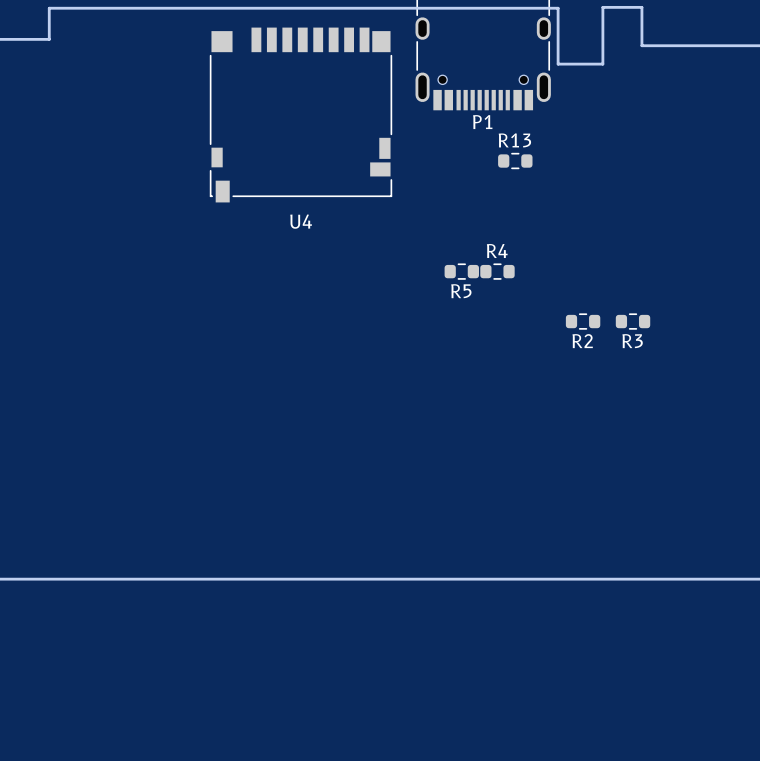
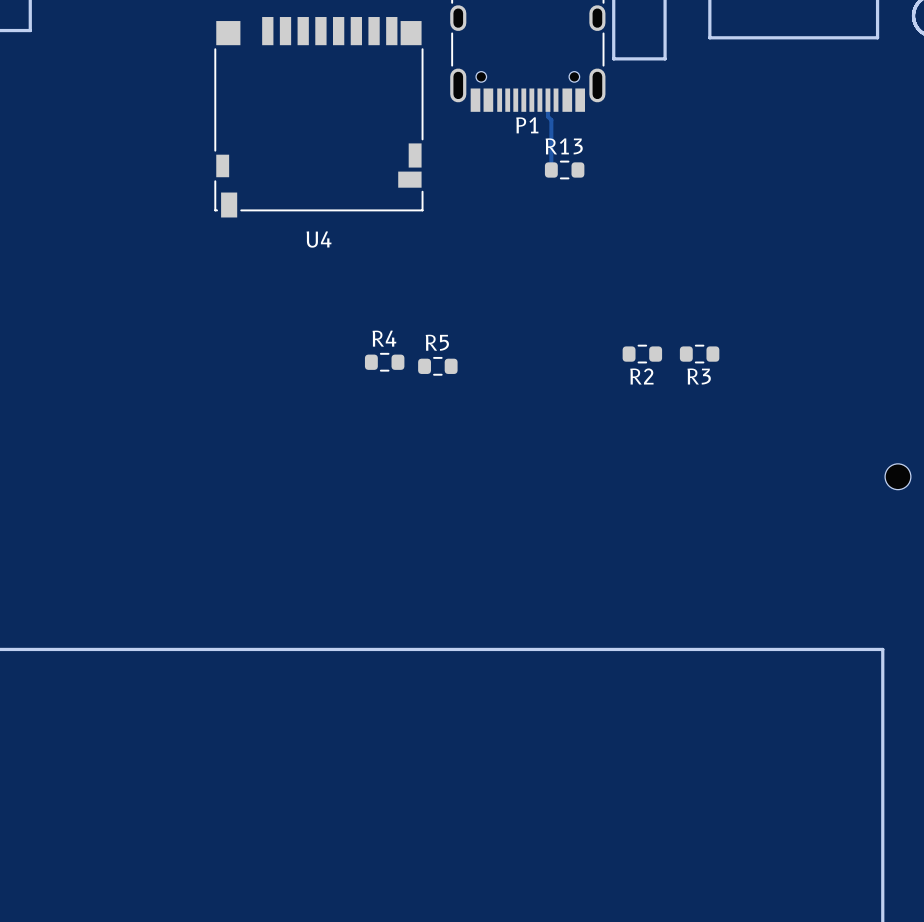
track: none -> (547, 100) (547, 116) (551, 120) (551, 170)
R5 position: (461, 271) -> (437, 366)
R4 position: (497, 271) -> (384, 362)
R5 name position: R5 (461, 291) -> R5 (437, 342)

